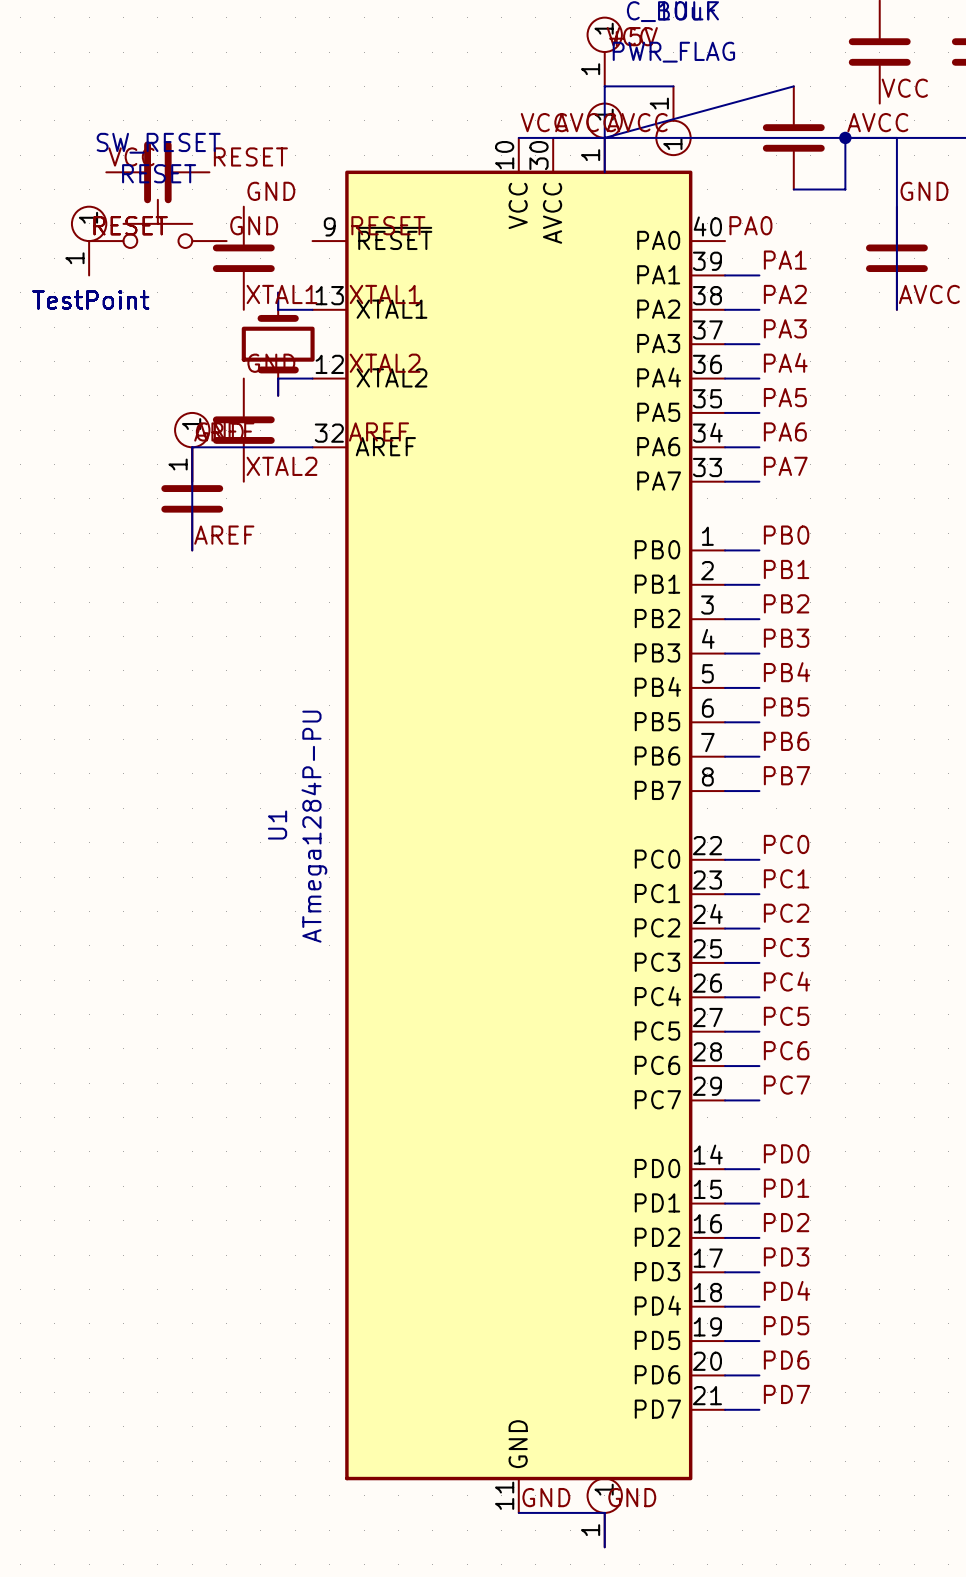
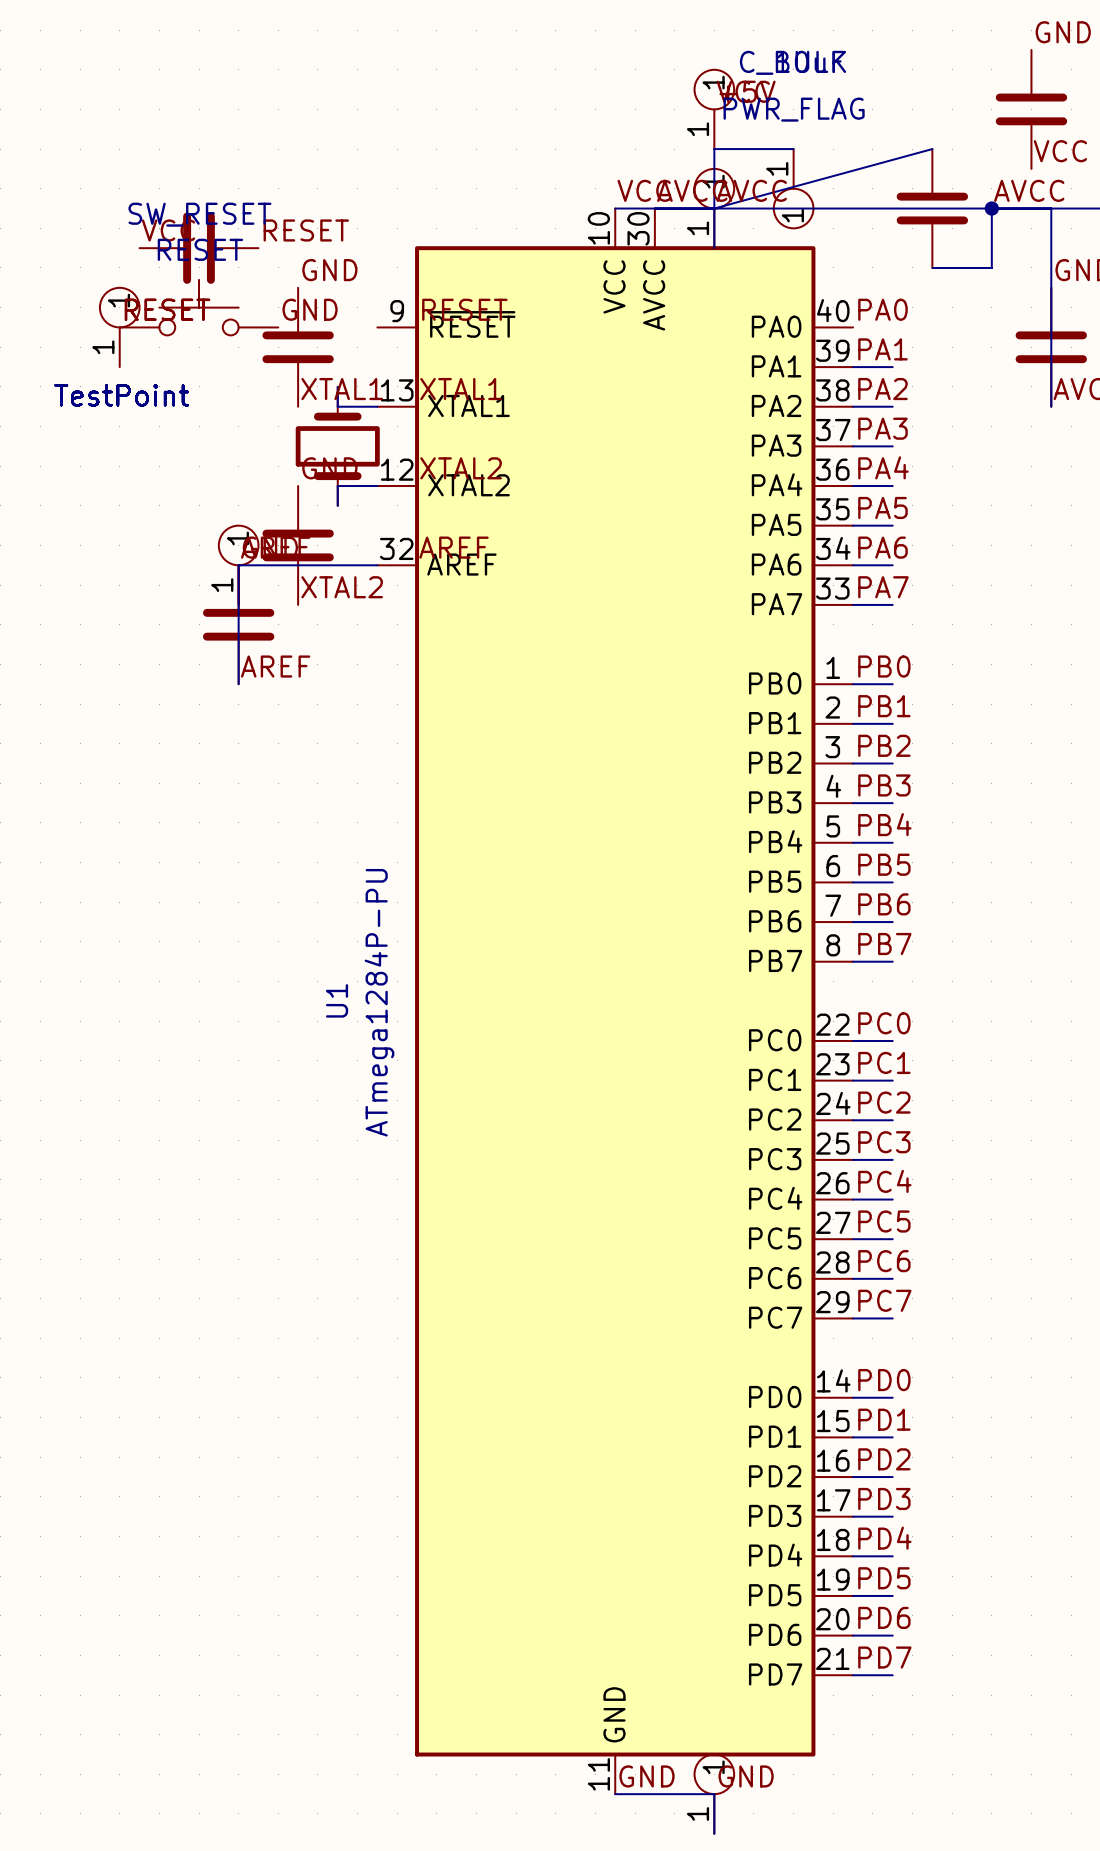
label position: PA1 (785, 260) -> PA1 (882, 349)
label position: PA2 (785, 294) -> PA2 (882, 389)
label position: PA3 (785, 328) -> PA3 (882, 428)
label position: PA4 (785, 362) -> PA4 (883, 467)
label position: PA5 (785, 397) -> PA5 (882, 507)
label position: PA6 (785, 431) -> PA6 (882, 547)
label position: PA7 (785, 466) -> PA7 (883, 587)
label position: PB0 (786, 535) -> PB0 (884, 666)
label position: PB1 (786, 569) -> PB1 (884, 706)
label position: PB2 (786, 603) -> PB2 (884, 745)
label position: PB3 (786, 638) -> PB3 (884, 785)
label position: PB4 (786, 672) -> PB4 (884, 824)
label position: PB5 (786, 706) -> PB5 (884, 864)
label position: PB6 (786, 741) -> PB6 (884, 904)
label position: PB7 (786, 775) -> PB7 (884, 944)
label position: PC0 (786, 844) -> PC0 (884, 1023)
label position: PC1 (786, 878) -> PC1 (884, 1062)
label position: PC2 (786, 913) -> PC2 (884, 1102)
label position: PC3 (786, 947) -> PC3 (884, 1142)
label position: PC4 (786, 981) -> PC4 (884, 1181)
label position: PC5 (786, 1016) -> PC5 (884, 1221)
label position: PC6 (786, 1050) -> PC6 (884, 1261)
label position: PC7 (786, 1085) -> PC7 (884, 1300)
label position: PD0 (786, 1153) -> PD0 (884, 1380)
label position: PD1 (786, 1188) -> PD1 (884, 1419)
label position: PD2 (786, 1222) -> PD2 (884, 1459)
label position: PD3 (786, 1256) -> PD3 (884, 1498)
label position: PD4 (786, 1290) -> PD4 (884, 1538)
label position: PD5 (786, 1325) -> PD5 (884, 1578)
label position: PD6 (786, 1360) -> PD6 (884, 1617)
label position: PD7 (786, 1394) -> PD7 (884, 1657)

